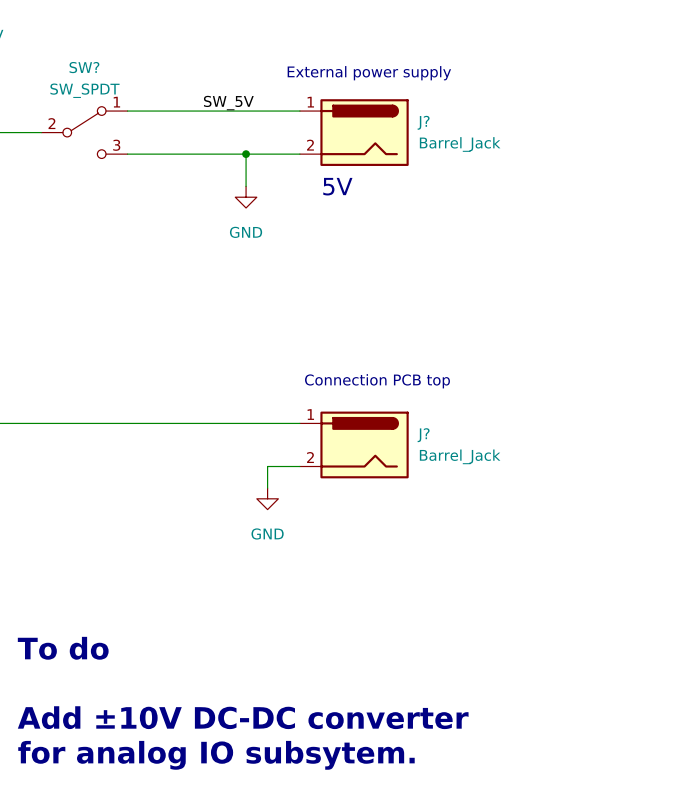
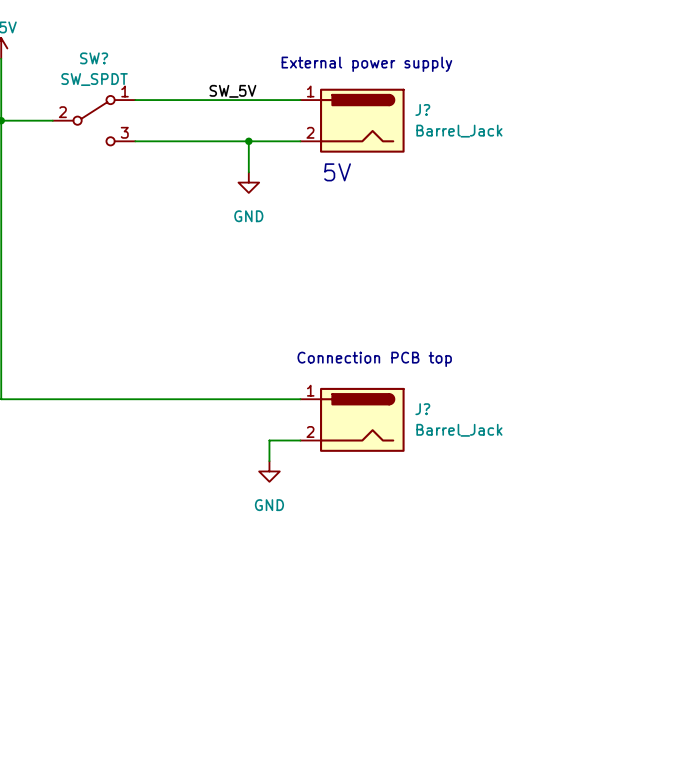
text: To do (63, 648) -> none
text: Add ±10V DC-DC converter (243, 717) -> none
text: for analog IO subsytem. (216, 755) -> none

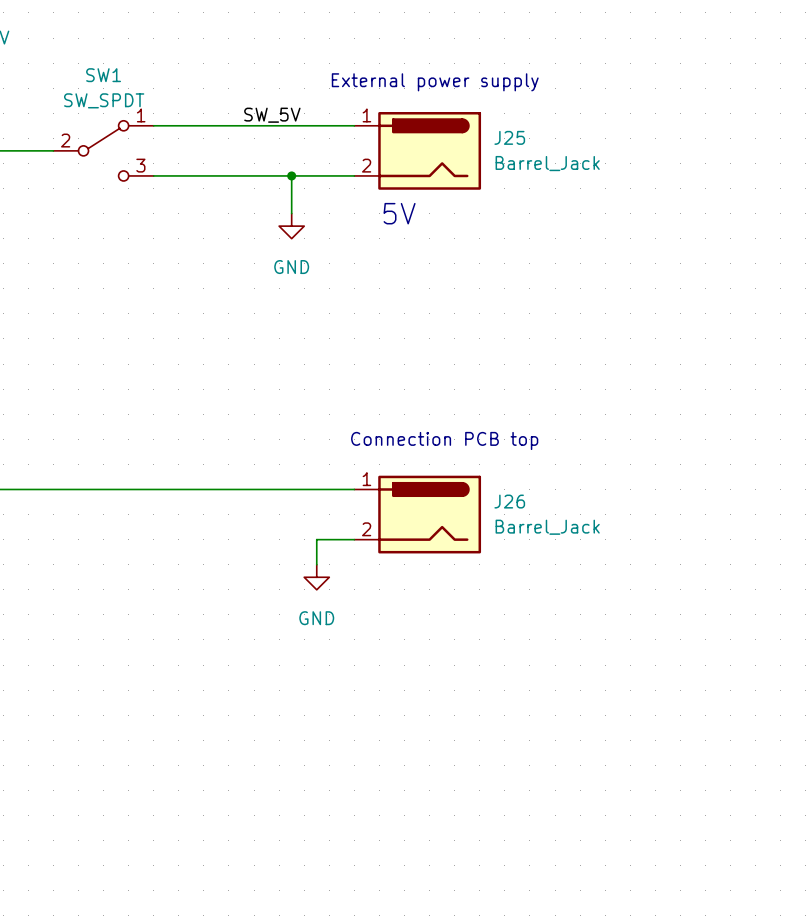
SW? name: SW? (94, 58) -> SW1 (103, 75)
J? name: J? (422, 109) -> J25 (509, 137)
J? name: J? (422, 409) -> J26 (509, 501)

